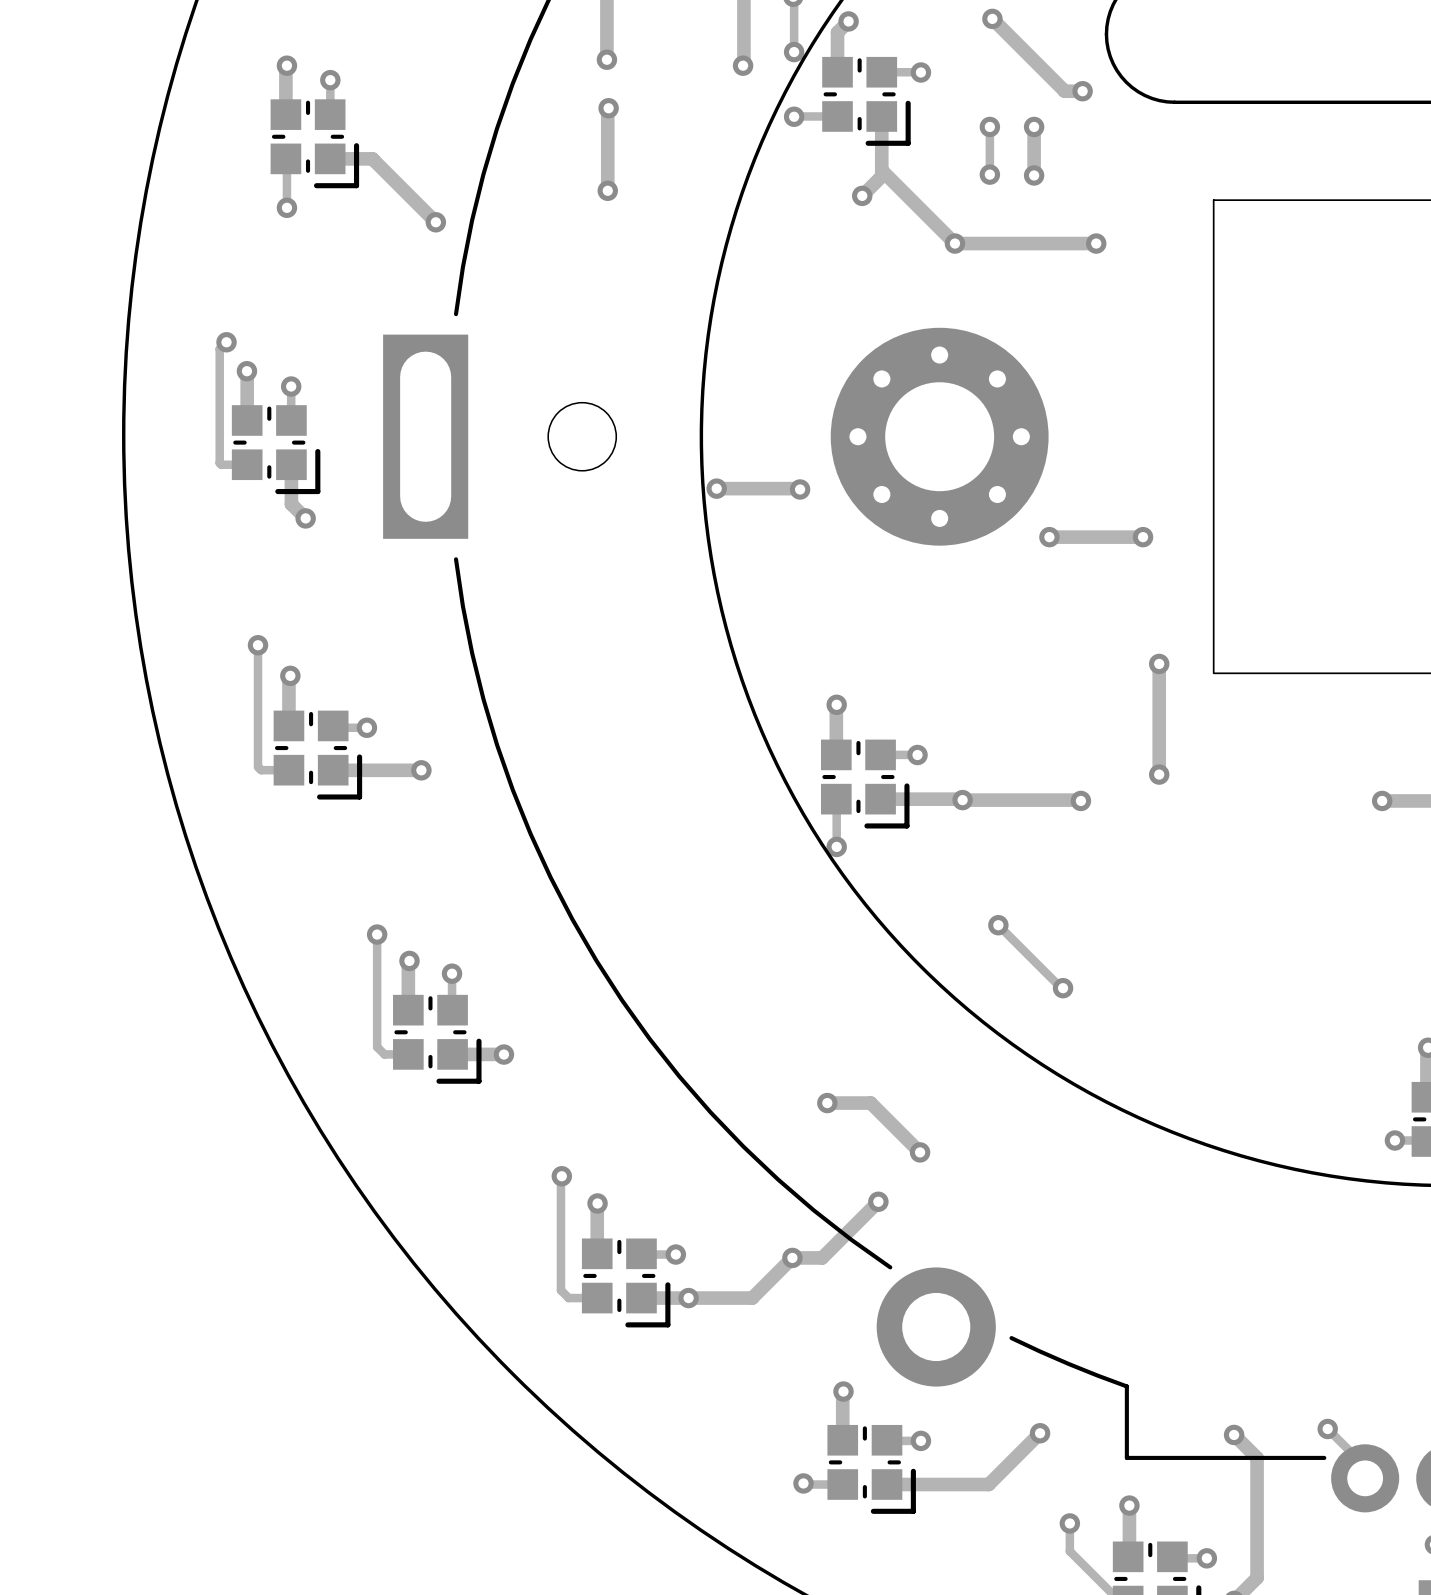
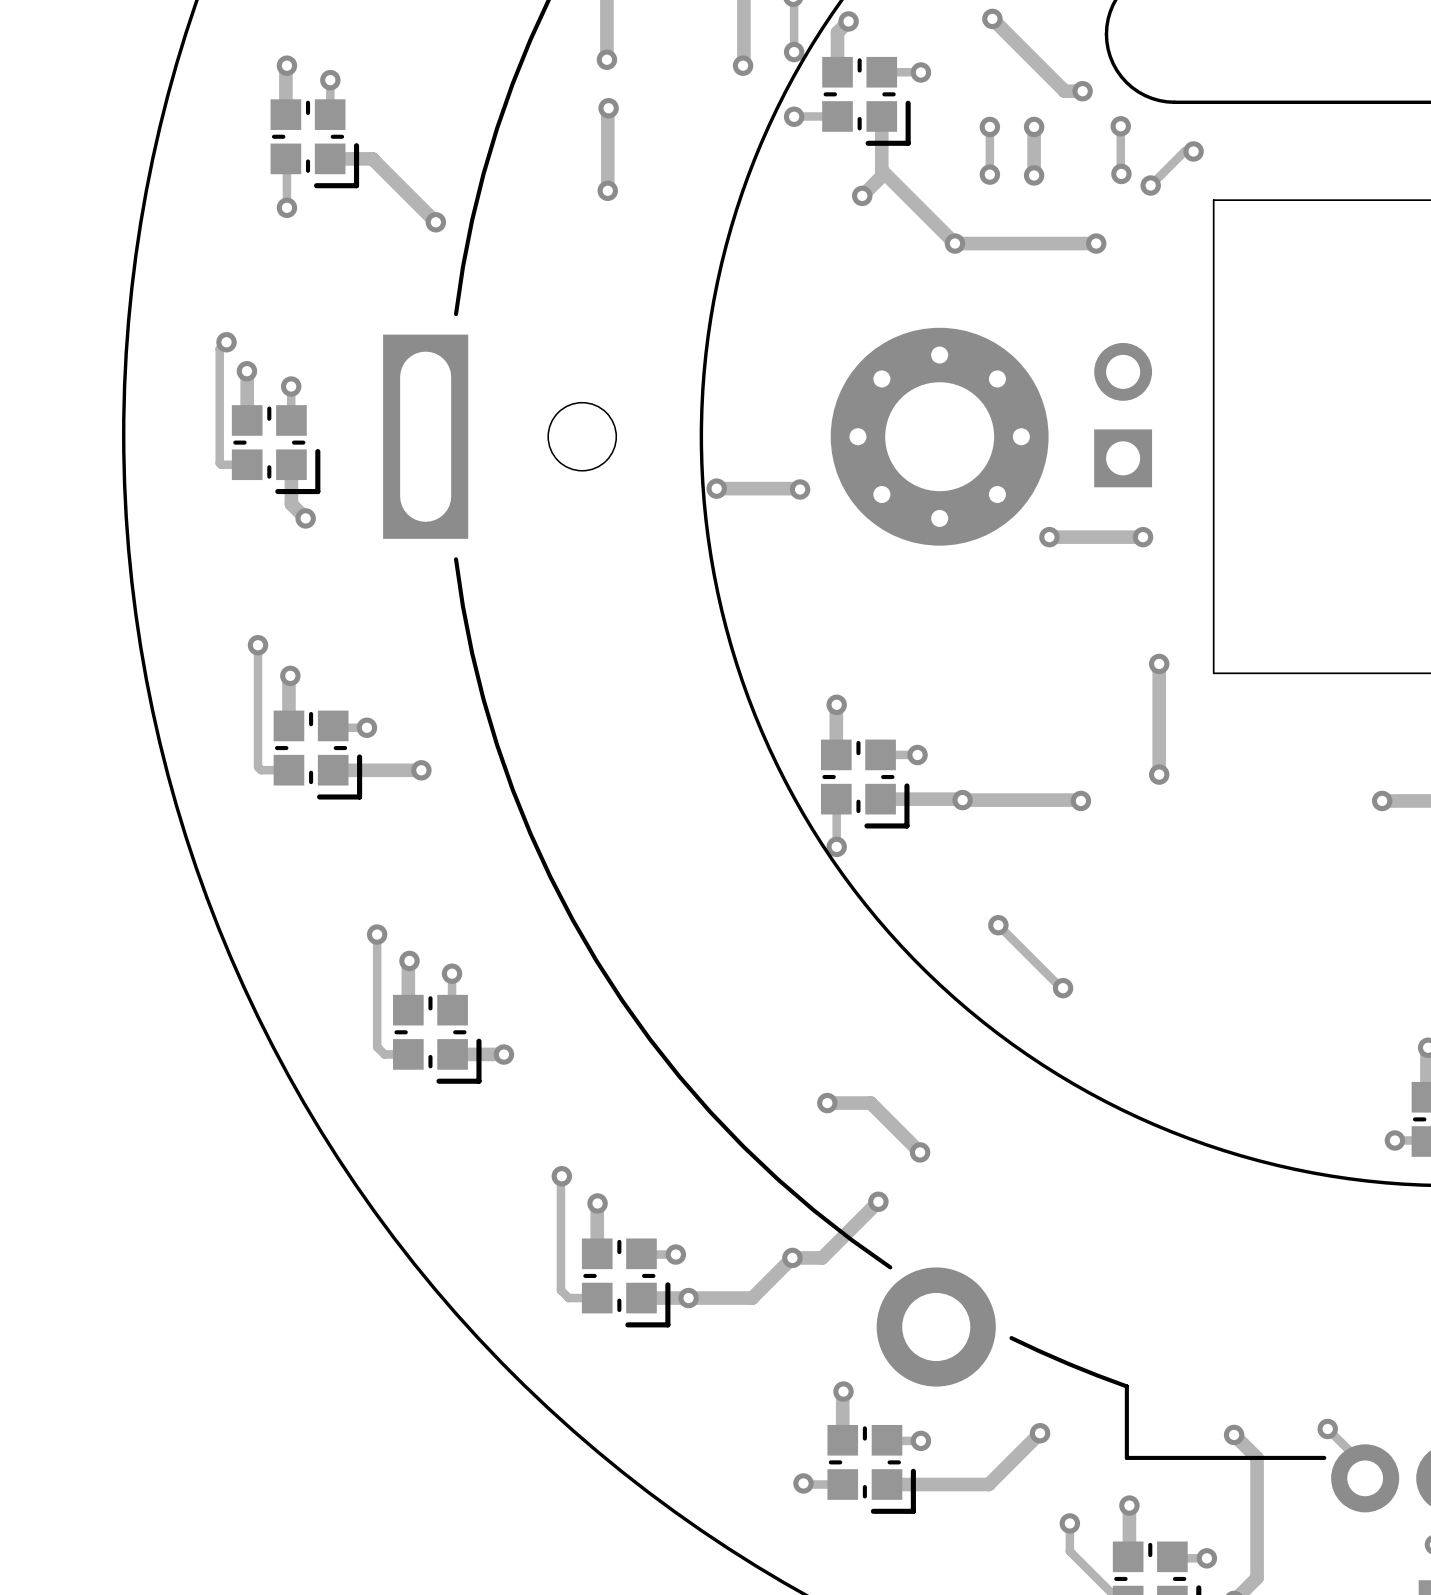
track: none -> (1120, 126) (1121, 173)
via: none -> (1120, 126)
track: none -> (1193, 151) (1184, 151) (1150, 185)
via: none -> (1193, 151)
via: none -> (1121, 173)
via: none -> (1150, 185)
part: none -> (1123, 415)

